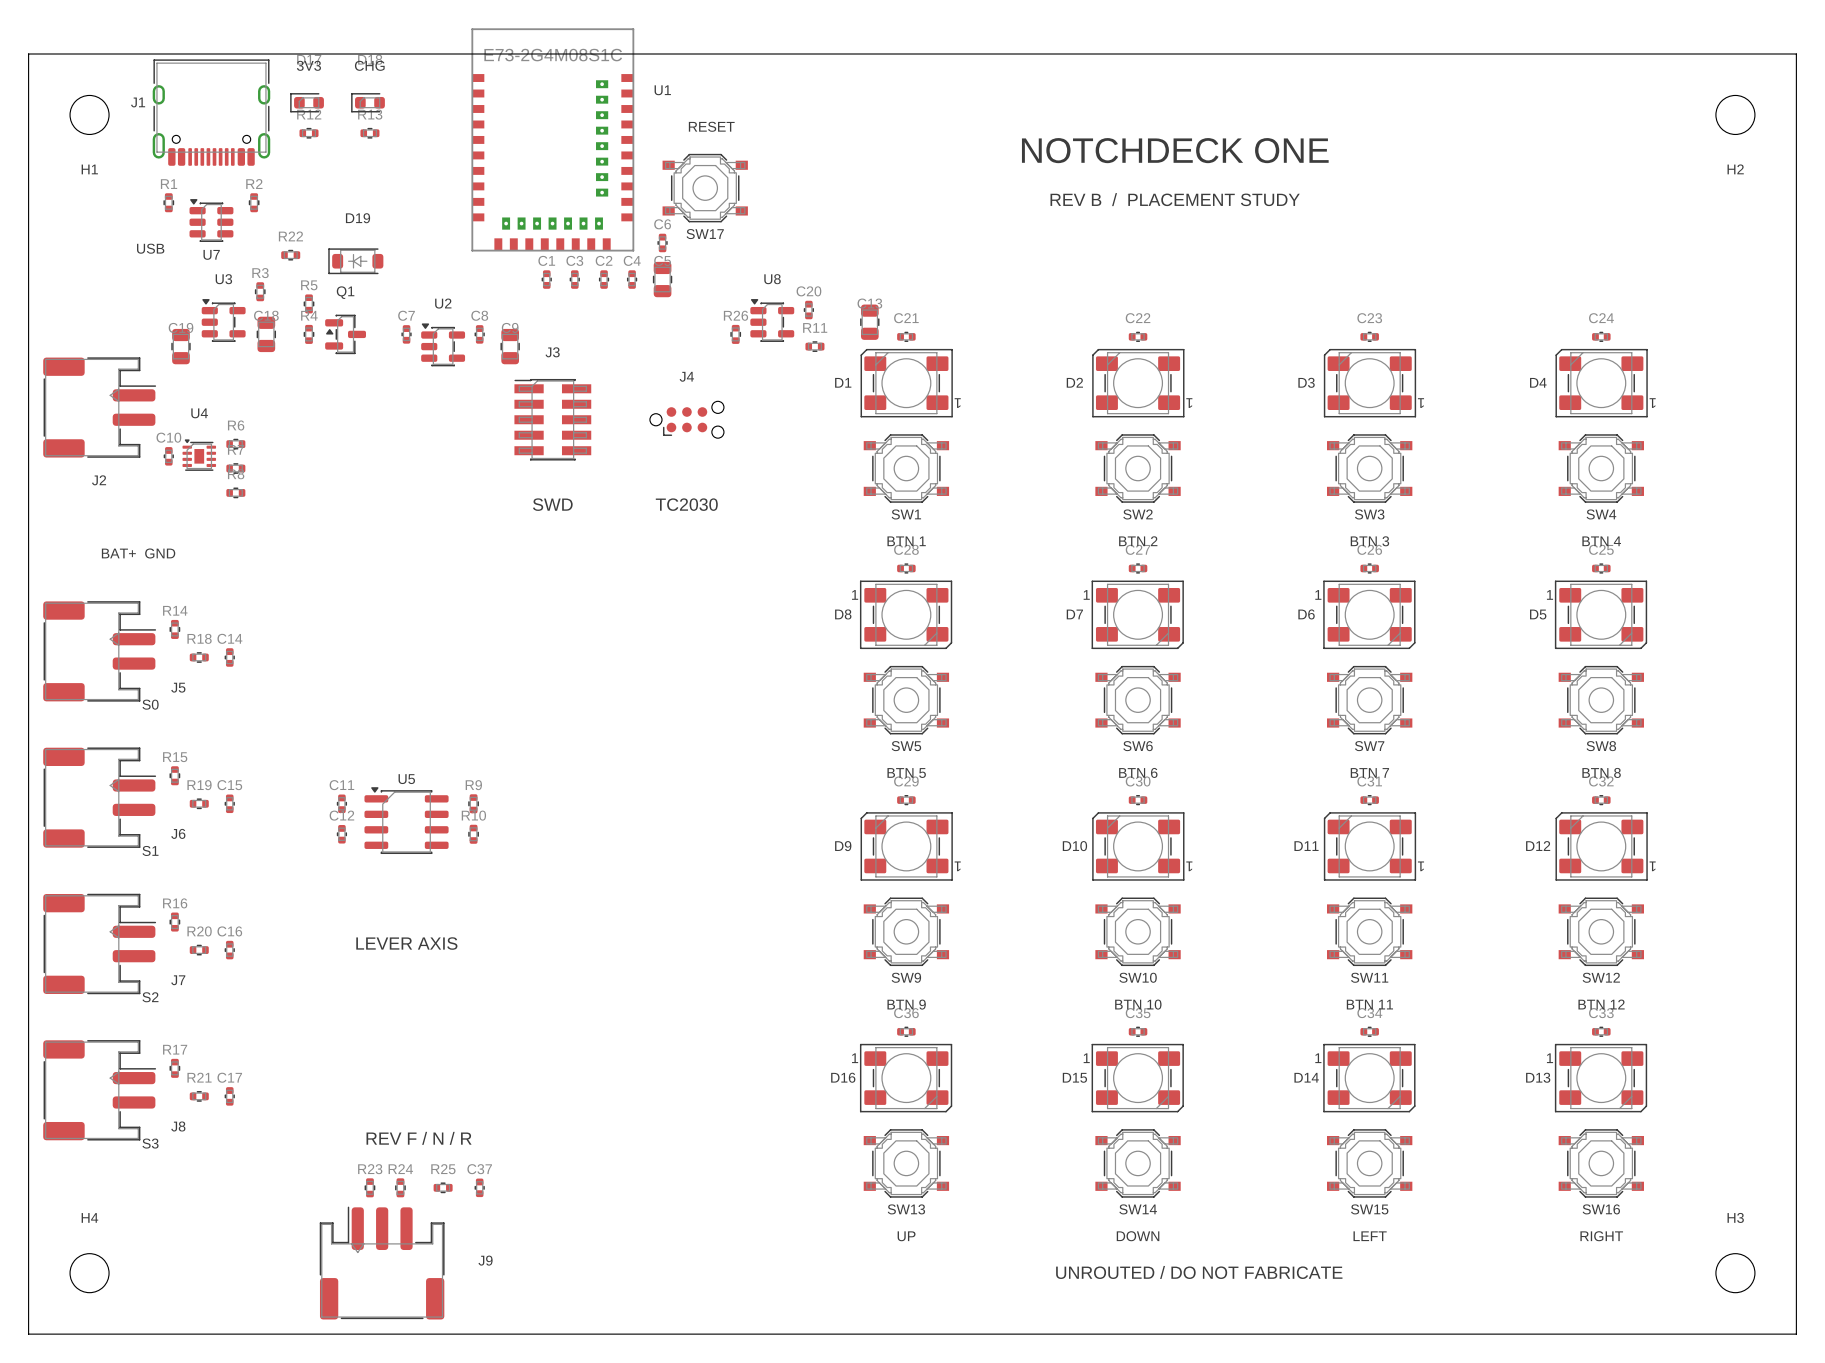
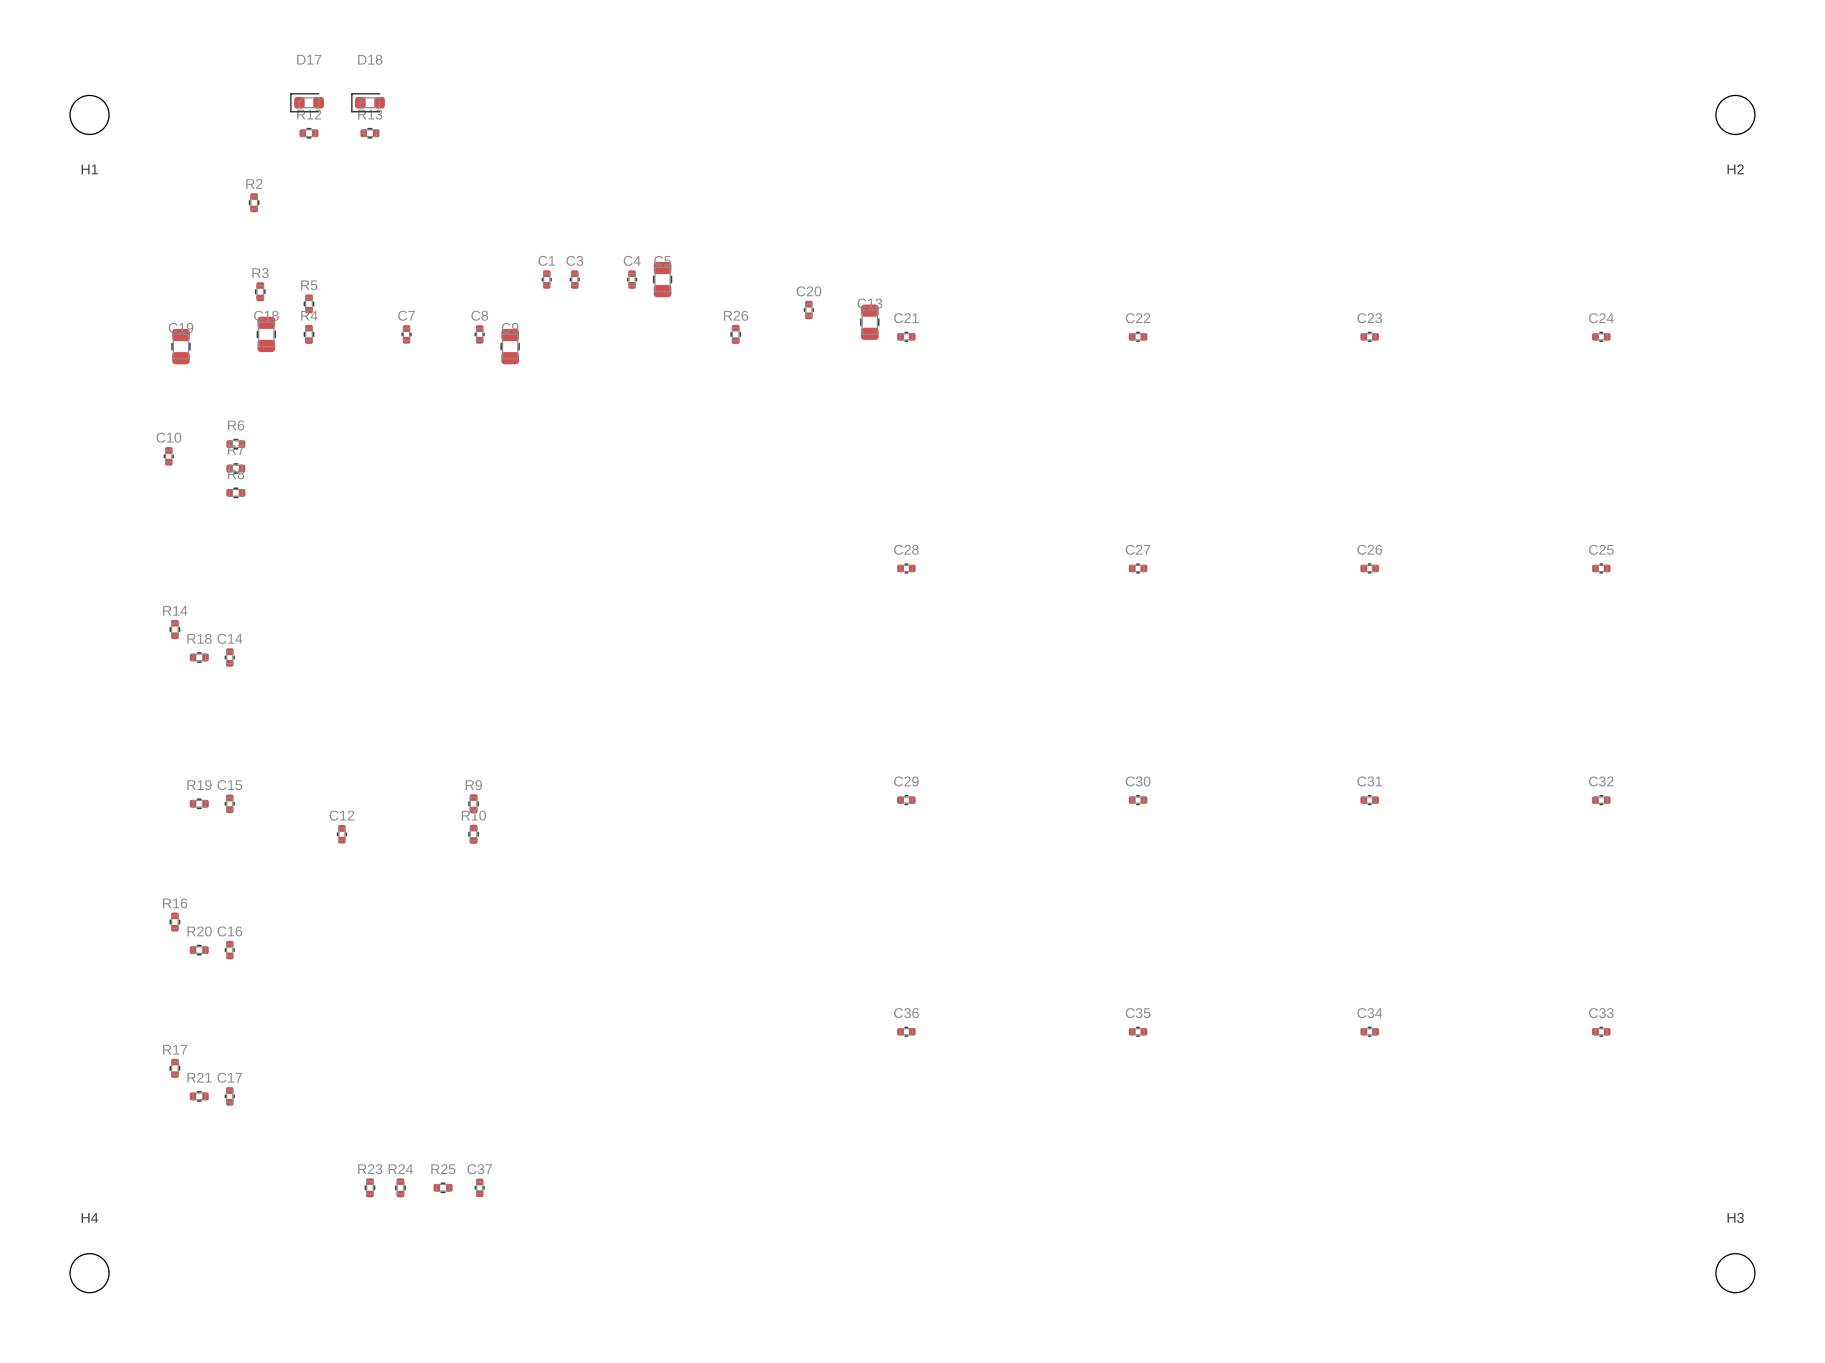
board edge: (28, 54) (1796, 54) (1796, 1334) (28, 1334) (28, 54) -> none
text: 3V3 (308, 65) -> none
text: CHG (369, 65) -> none
J1: (211, 112) -> none
text: RESET (711, 126) -> none
U1: (552, 139) -> none
text: NOTCHDECK ONE (1175, 150) -> none
SW17: (705, 188) -> none
text: REV B / PLACEMENT STUDY (1175, 199) -> none
R1: (168, 202) -> none
U7: (211, 220) -> none
C6: (662, 242) -> none
text: USB (150, 248) -> none
R22: (290, 255) -> none
D19: (355, 261) -> none
C2: (604, 279) -> none
U3: (223, 320) -> none
U8: (772, 320) -> none
Q1: (345, 334) -> none
U2: (443, 344) -> none
R11: (814, 346) -> none
D1: (906, 383) -> none
D2: (1138, 383) -> none
D3: (1369, 383) -> none
D4: (1601, 383) -> none
J2: (99, 407) -> none
J3: (552, 419) -> none
J4: (686, 419) -> none
U4: (199, 455) -> none
SW1: (906, 468) -> none
SW2: (1138, 468) -> none
SW3: (1369, 468) -> none
SW4: (1601, 468) -> none
text: SWD (552, 504) -> none
text: TC2030 (686, 504) -> none
text: BTN 1 (906, 541) -> none
text: BTN 2 (1138, 541) -> none
text: BTN 3 (1369, 541) -> none
text: BTN 4 (1601, 541) -> none
text: BAT+ GND (138, 553) -> none
D8: (906, 614) -> none
D7: (1137, 614) -> none
D6: (1369, 614) -> none
D5: (1601, 614) -> none
J5: (99, 651) -> none
SW5: (906, 700) -> none
SW6: (1138, 700) -> none
SW7: (1369, 700) -> none
SW8: (1601, 700) -> none
text: S0 (150, 704) -> none
text: BTN 6 (1138, 772) -> none
text: BTN 7 (1369, 772) -> none
text: BTN 8 (1601, 772) -> none
text: BTN 5 (906, 773) -> none
R15: (174, 775) -> none
J6: (99, 797) -> none
C11: (341, 803) -> none
U5: (406, 820) -> none
D9: (906, 846) -> none
D10: (1138, 846) -> none
D11: (1369, 846) -> none
D12: (1601, 846) -> none
text: S1 (150, 850) -> none
SW9: (906, 931) -> none
SW10: (1138, 931) -> none
SW11: (1369, 931) -> none
SW12: (1601, 931) -> none
J7: (99, 943) -> none
text: LEVER AXIS (406, 943) -> none
text: S2 (150, 997) -> none
text: BTN 9 (906, 1004) -> none
text: BTN 10 (1138, 1004) -> none
text: BTN 11 (1369, 1004) -> none
text: BTN 12 (1601, 1004) -> none
D16: (906, 1078) -> none
D15: (1137, 1078) -> none
D14: (1369, 1078) -> none
D13: (1601, 1078) -> none
J8: (99, 1090) -> none
text: REV F / N / R (419, 1138) -> none
text: S3 (150, 1143) -> none
SW13: (906, 1163) -> none
SW14: (1138, 1163) -> none
SW15: (1369, 1163) -> none
SW16: (1601, 1163) -> none
text: UP (906, 1236) -> none
text: DOWN (1138, 1236) -> none
text: LEFT (1370, 1236) -> none
text: RIGHT (1601, 1236) -> none
J9: (382, 1263) -> none
text: UNROUTED / DO NOT FABRICATE (1199, 1272) -> none

